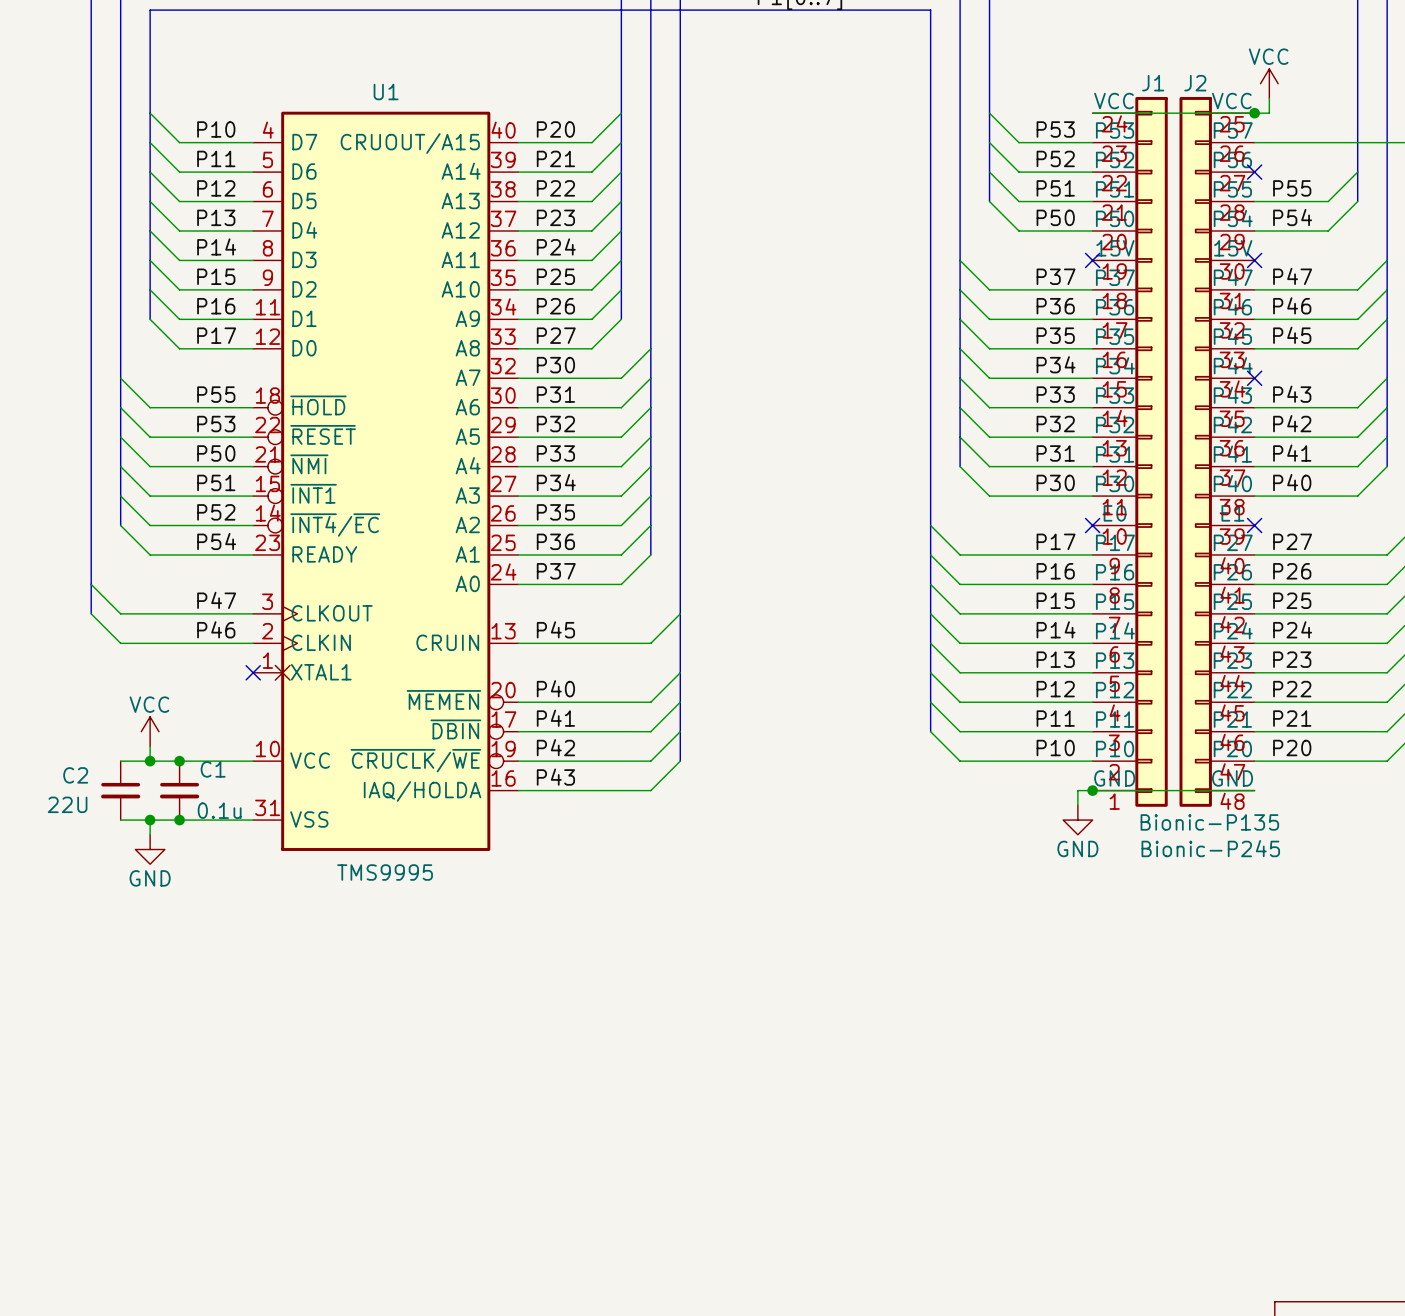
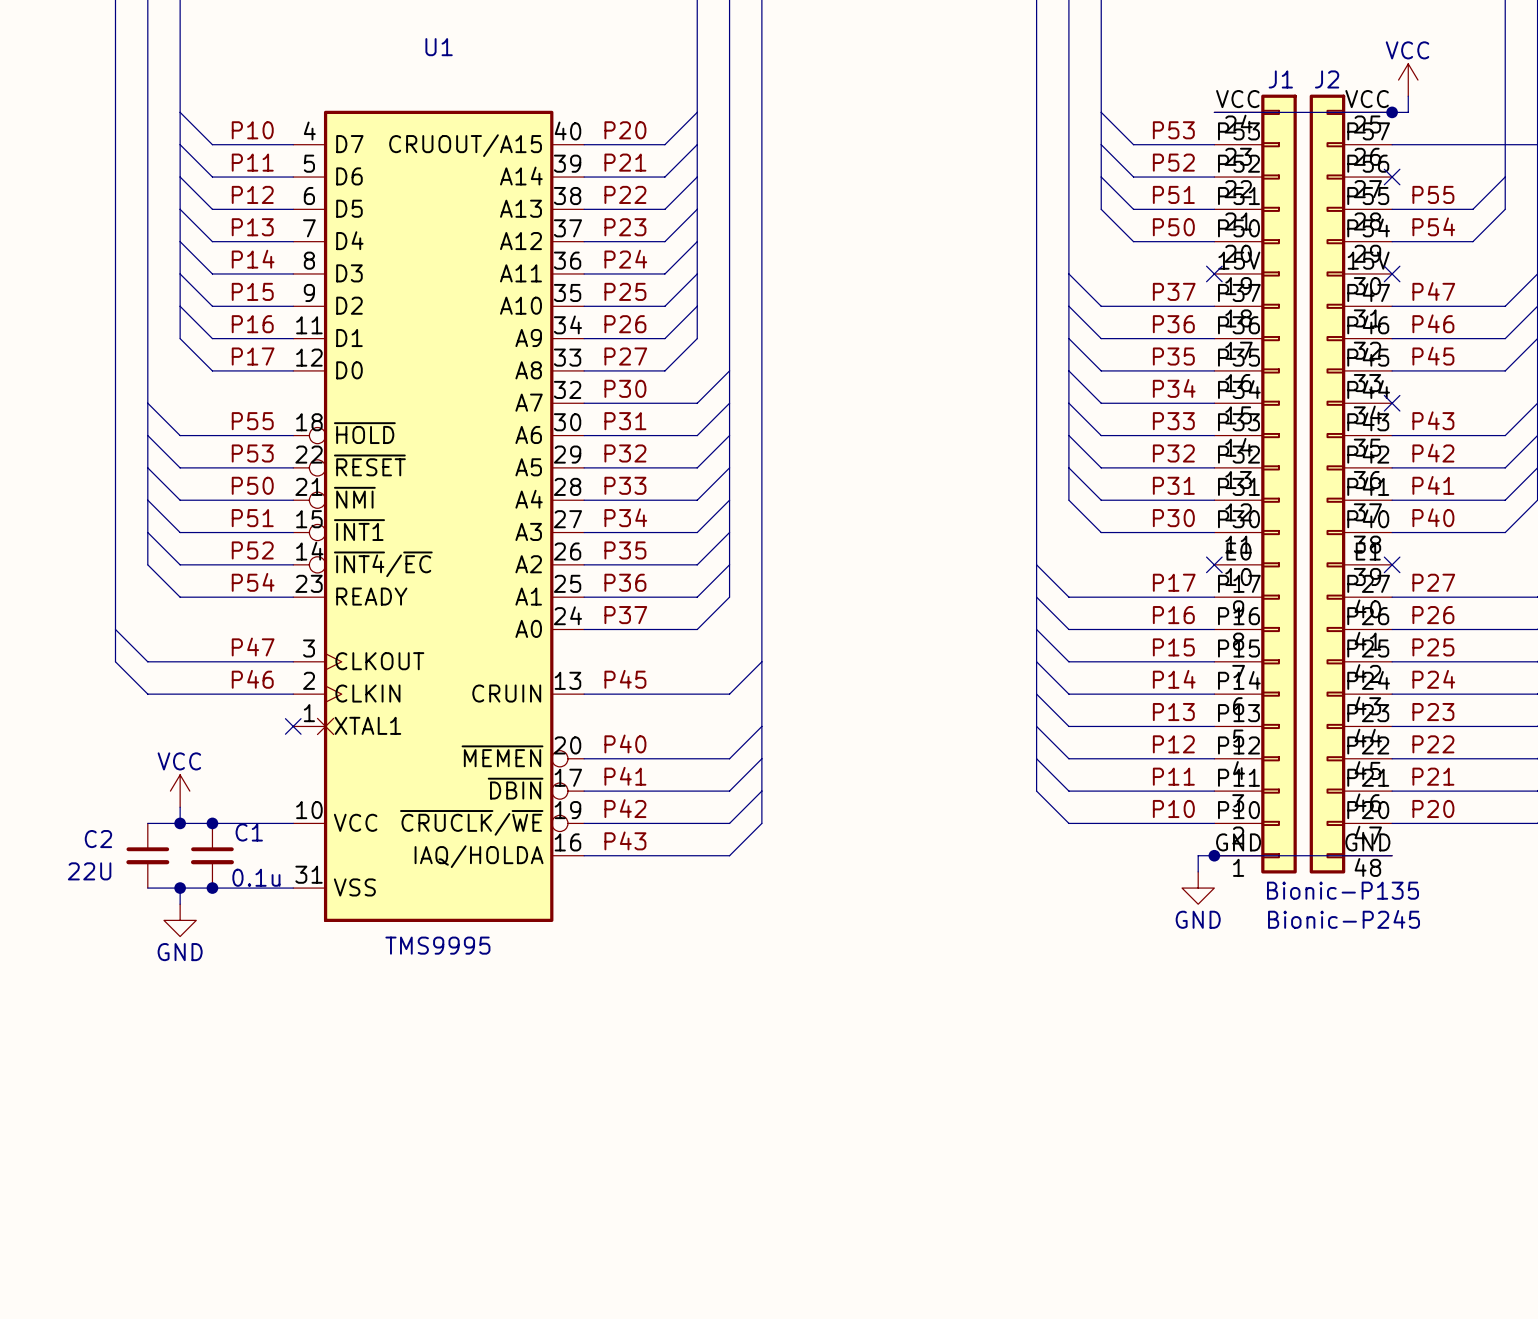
U1 name position: U1 (386, 92) -> U1 (439, 47)

